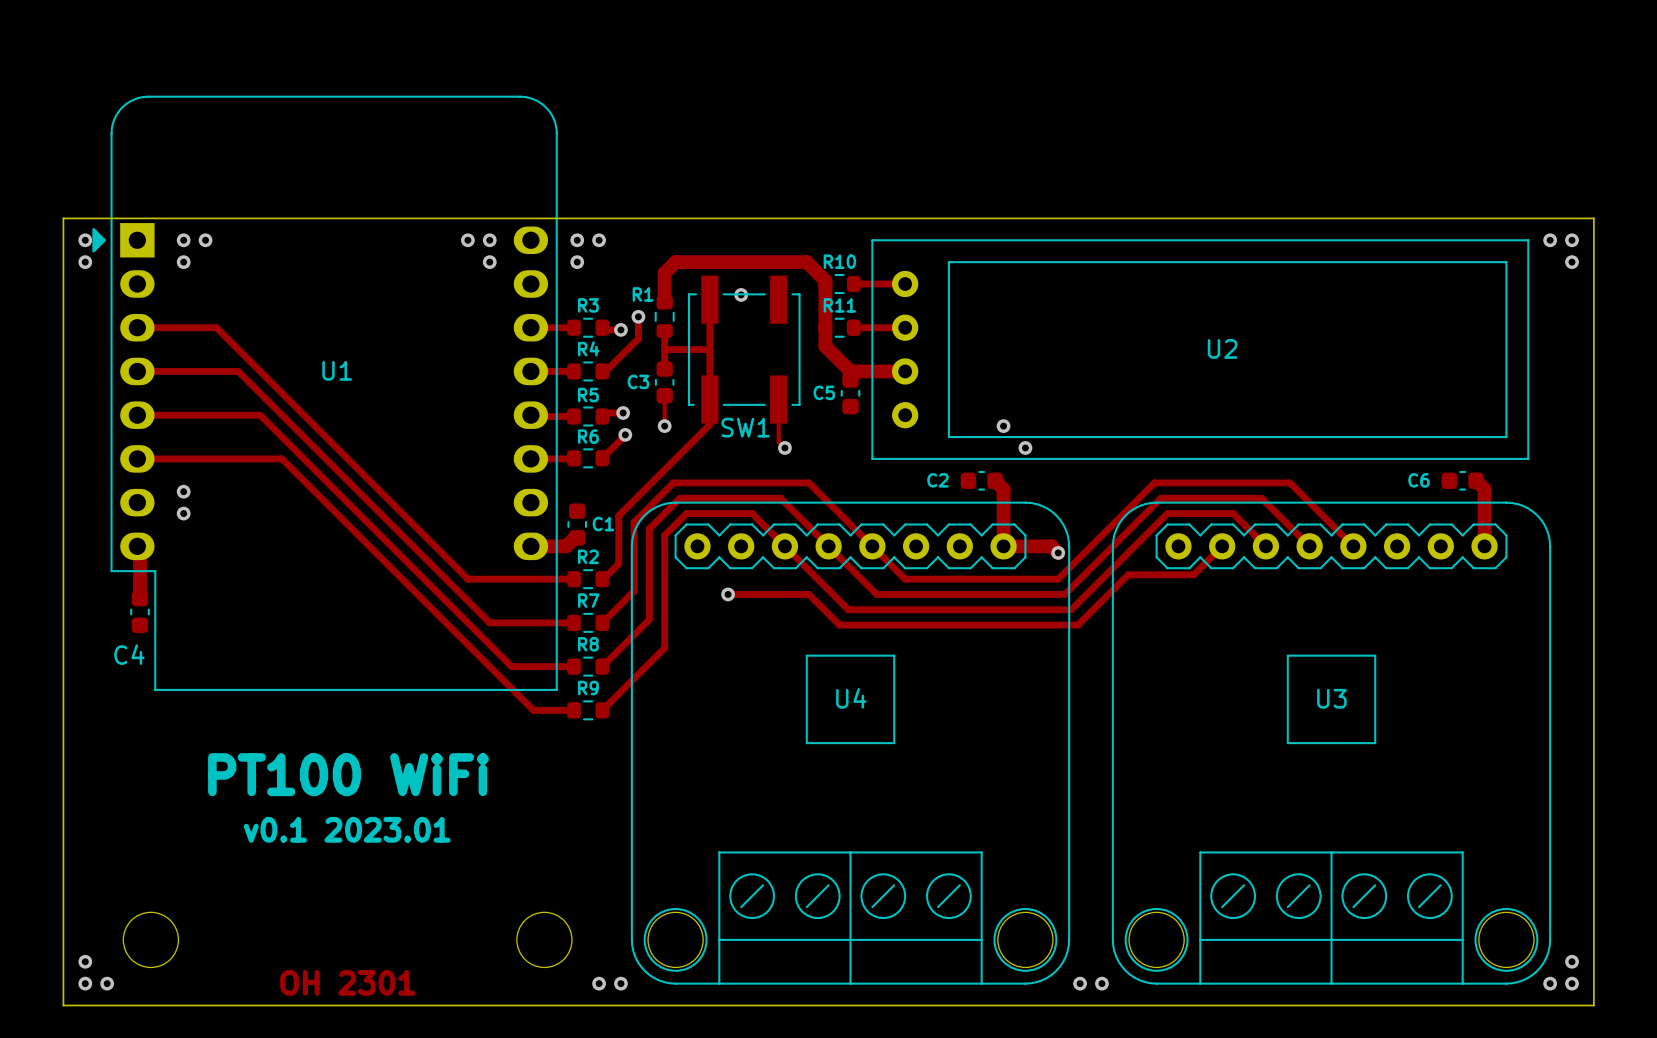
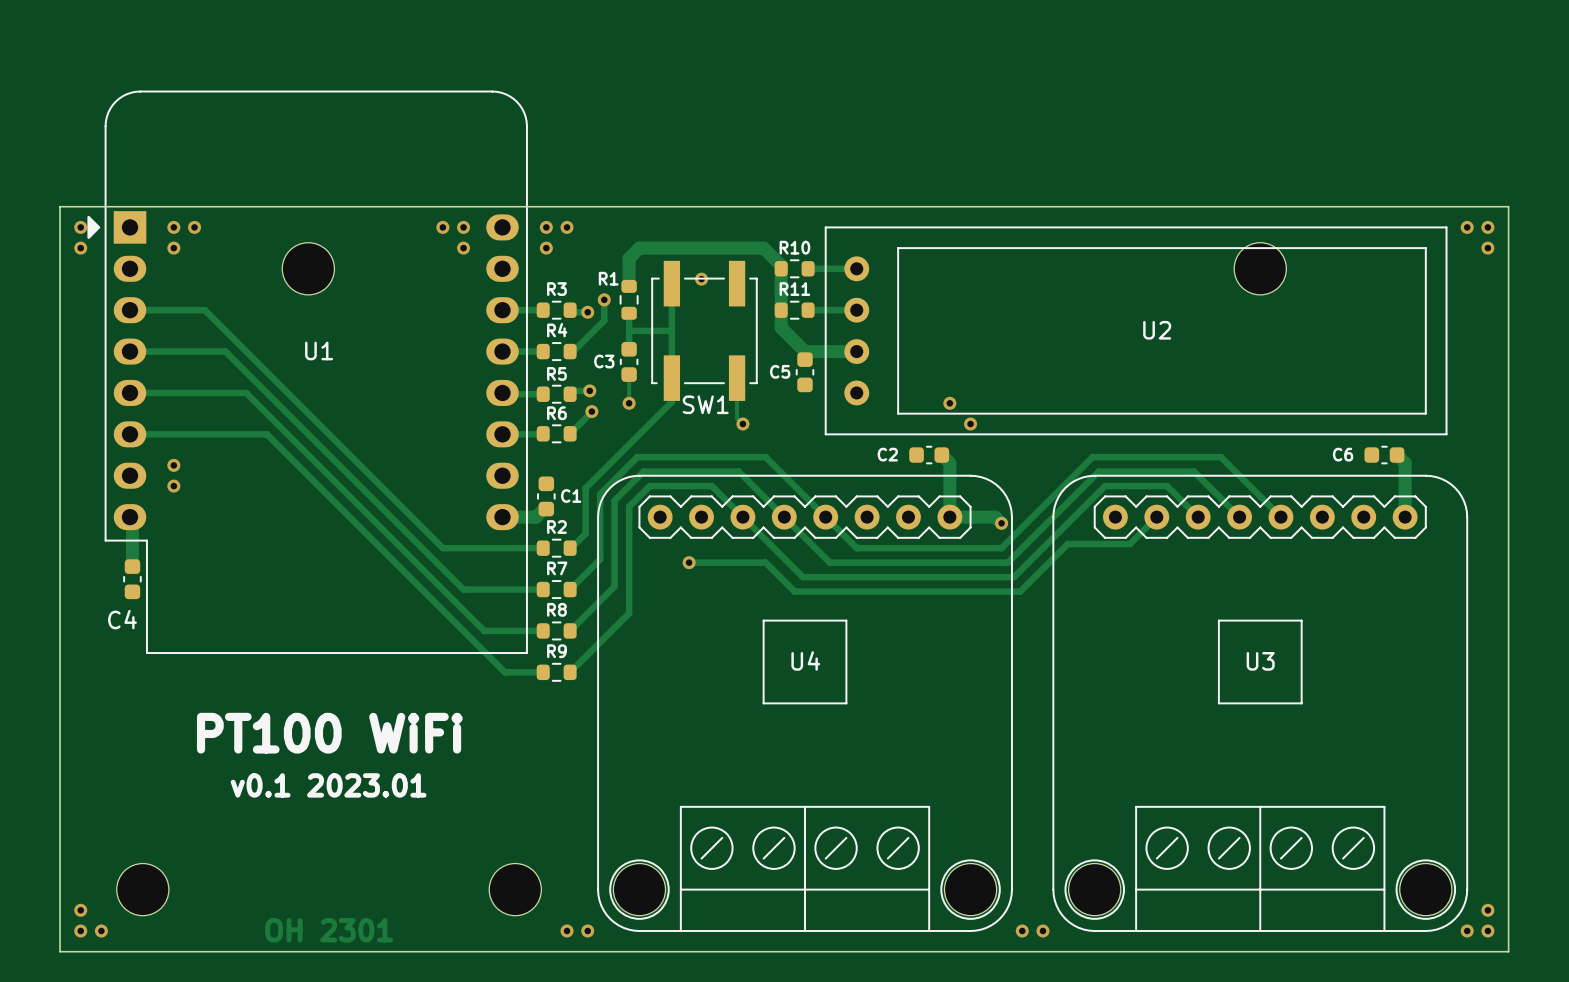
part: none -> (308, 268)
part: none -> (1260, 268)

